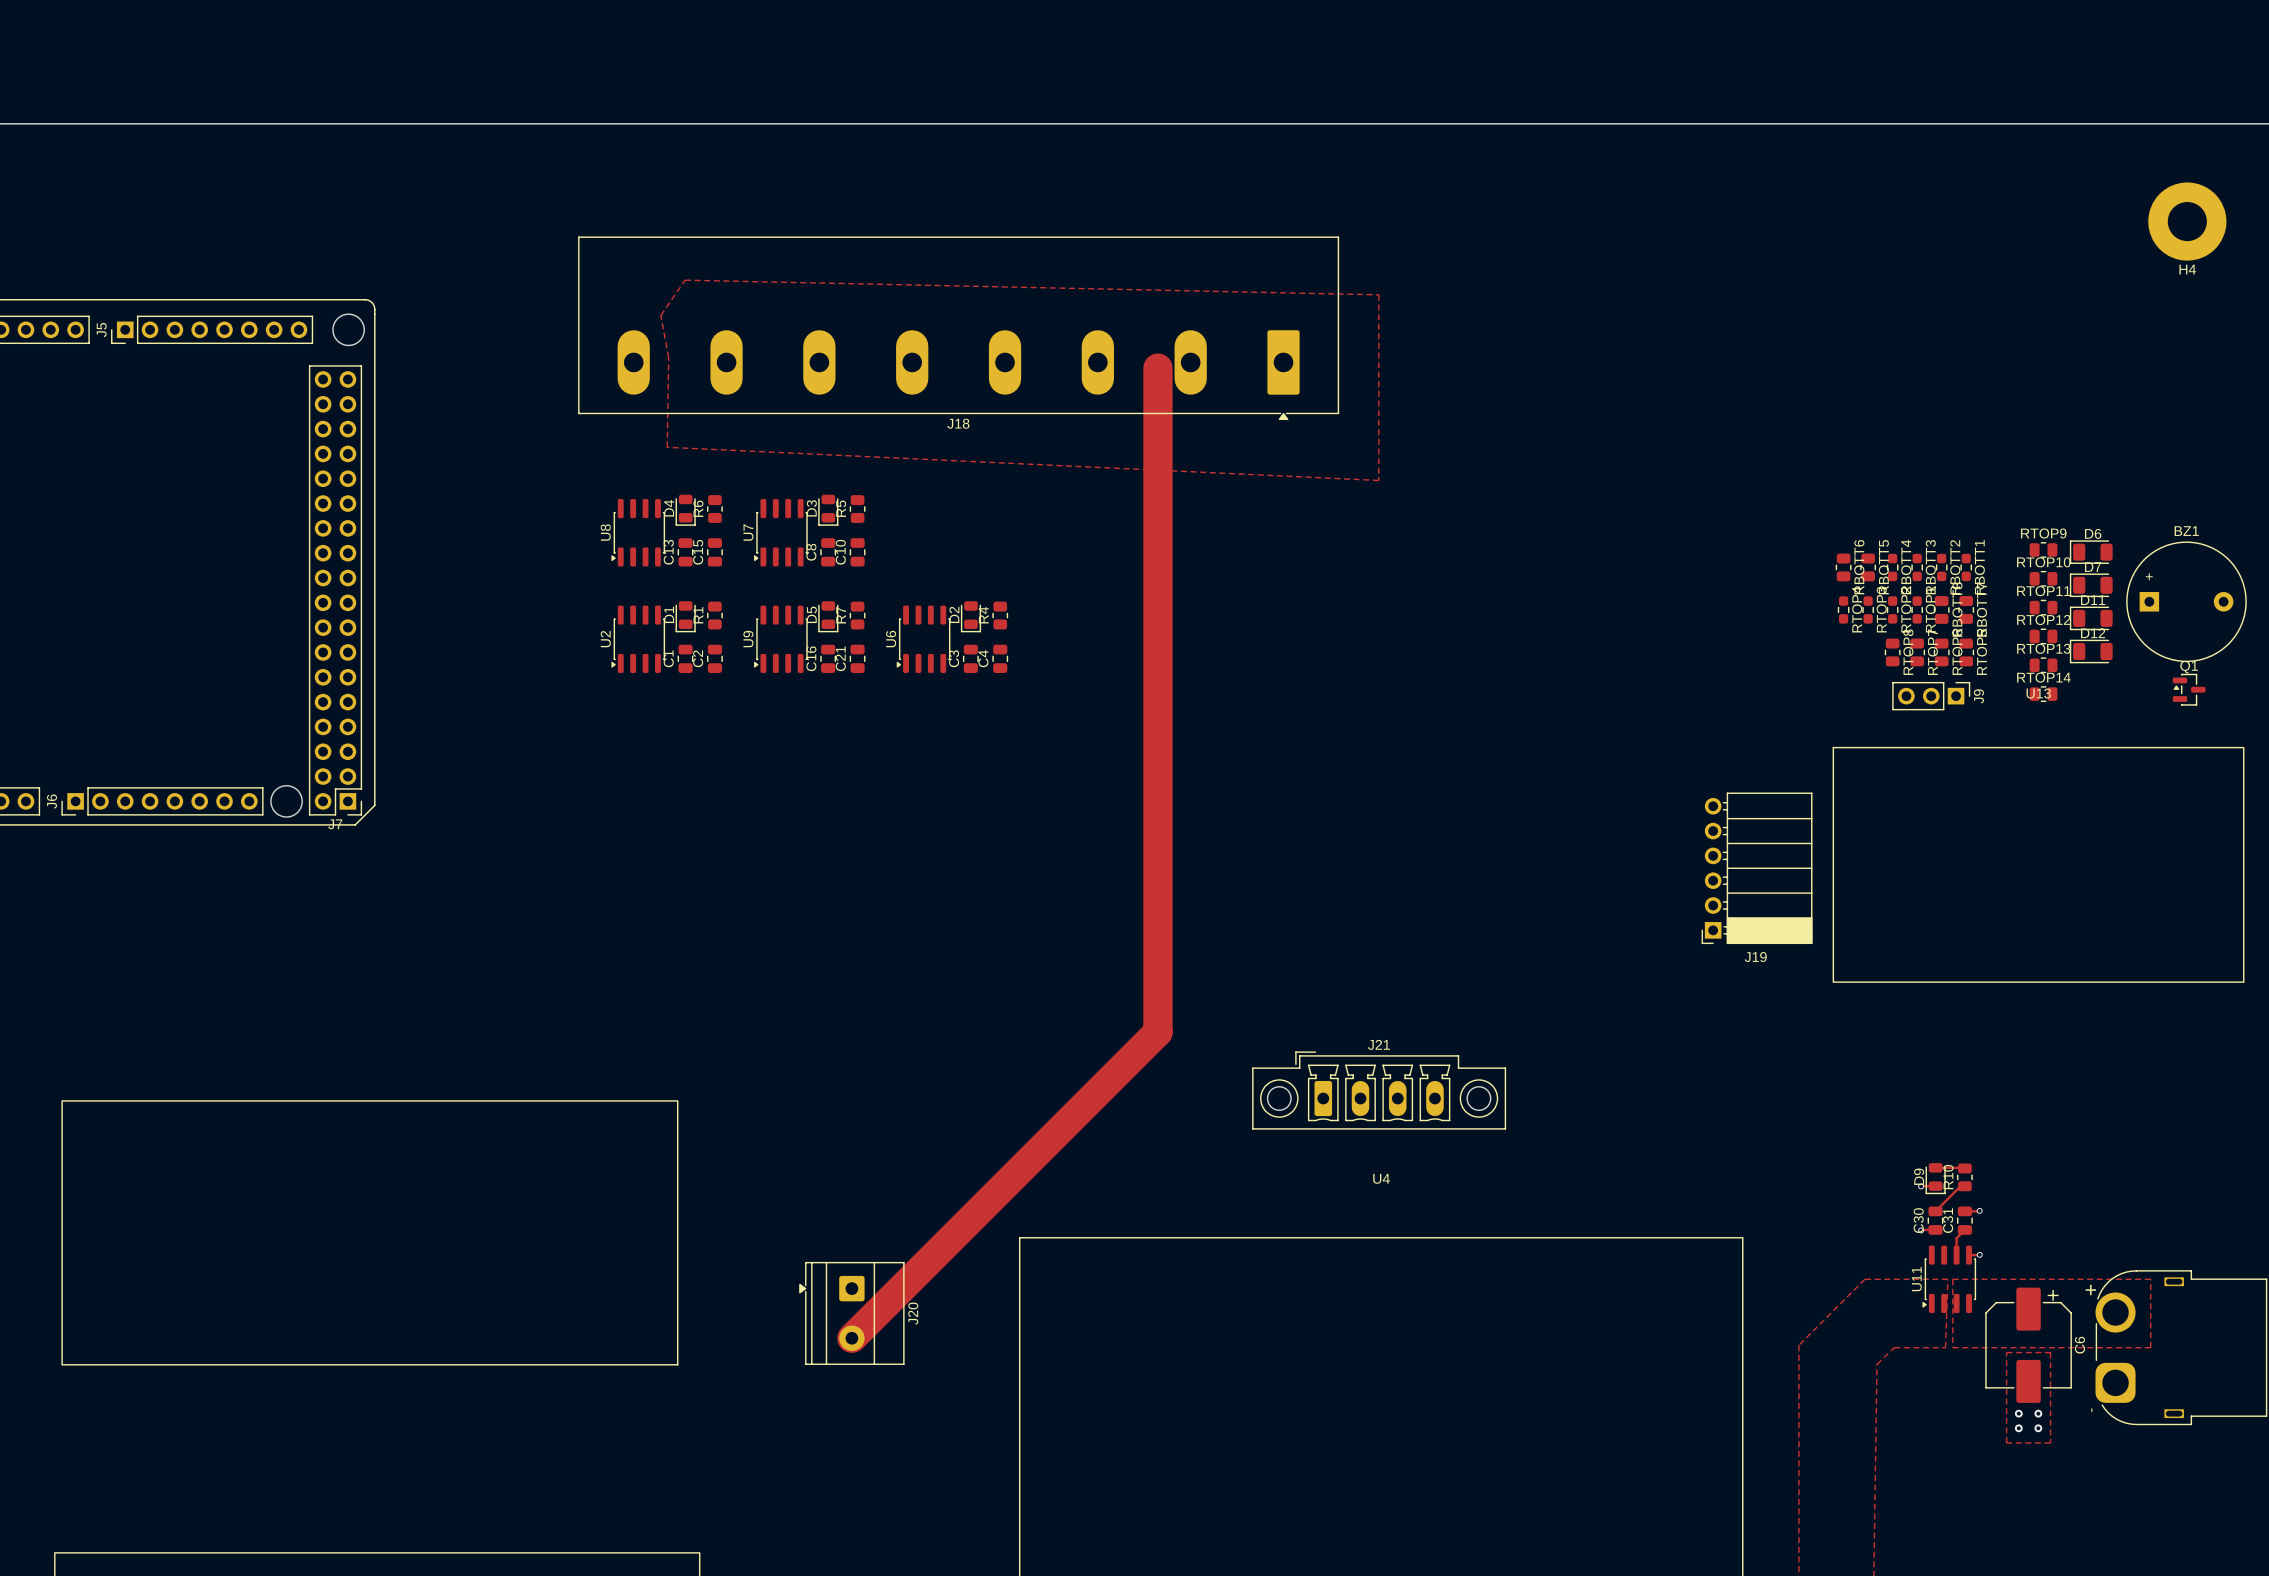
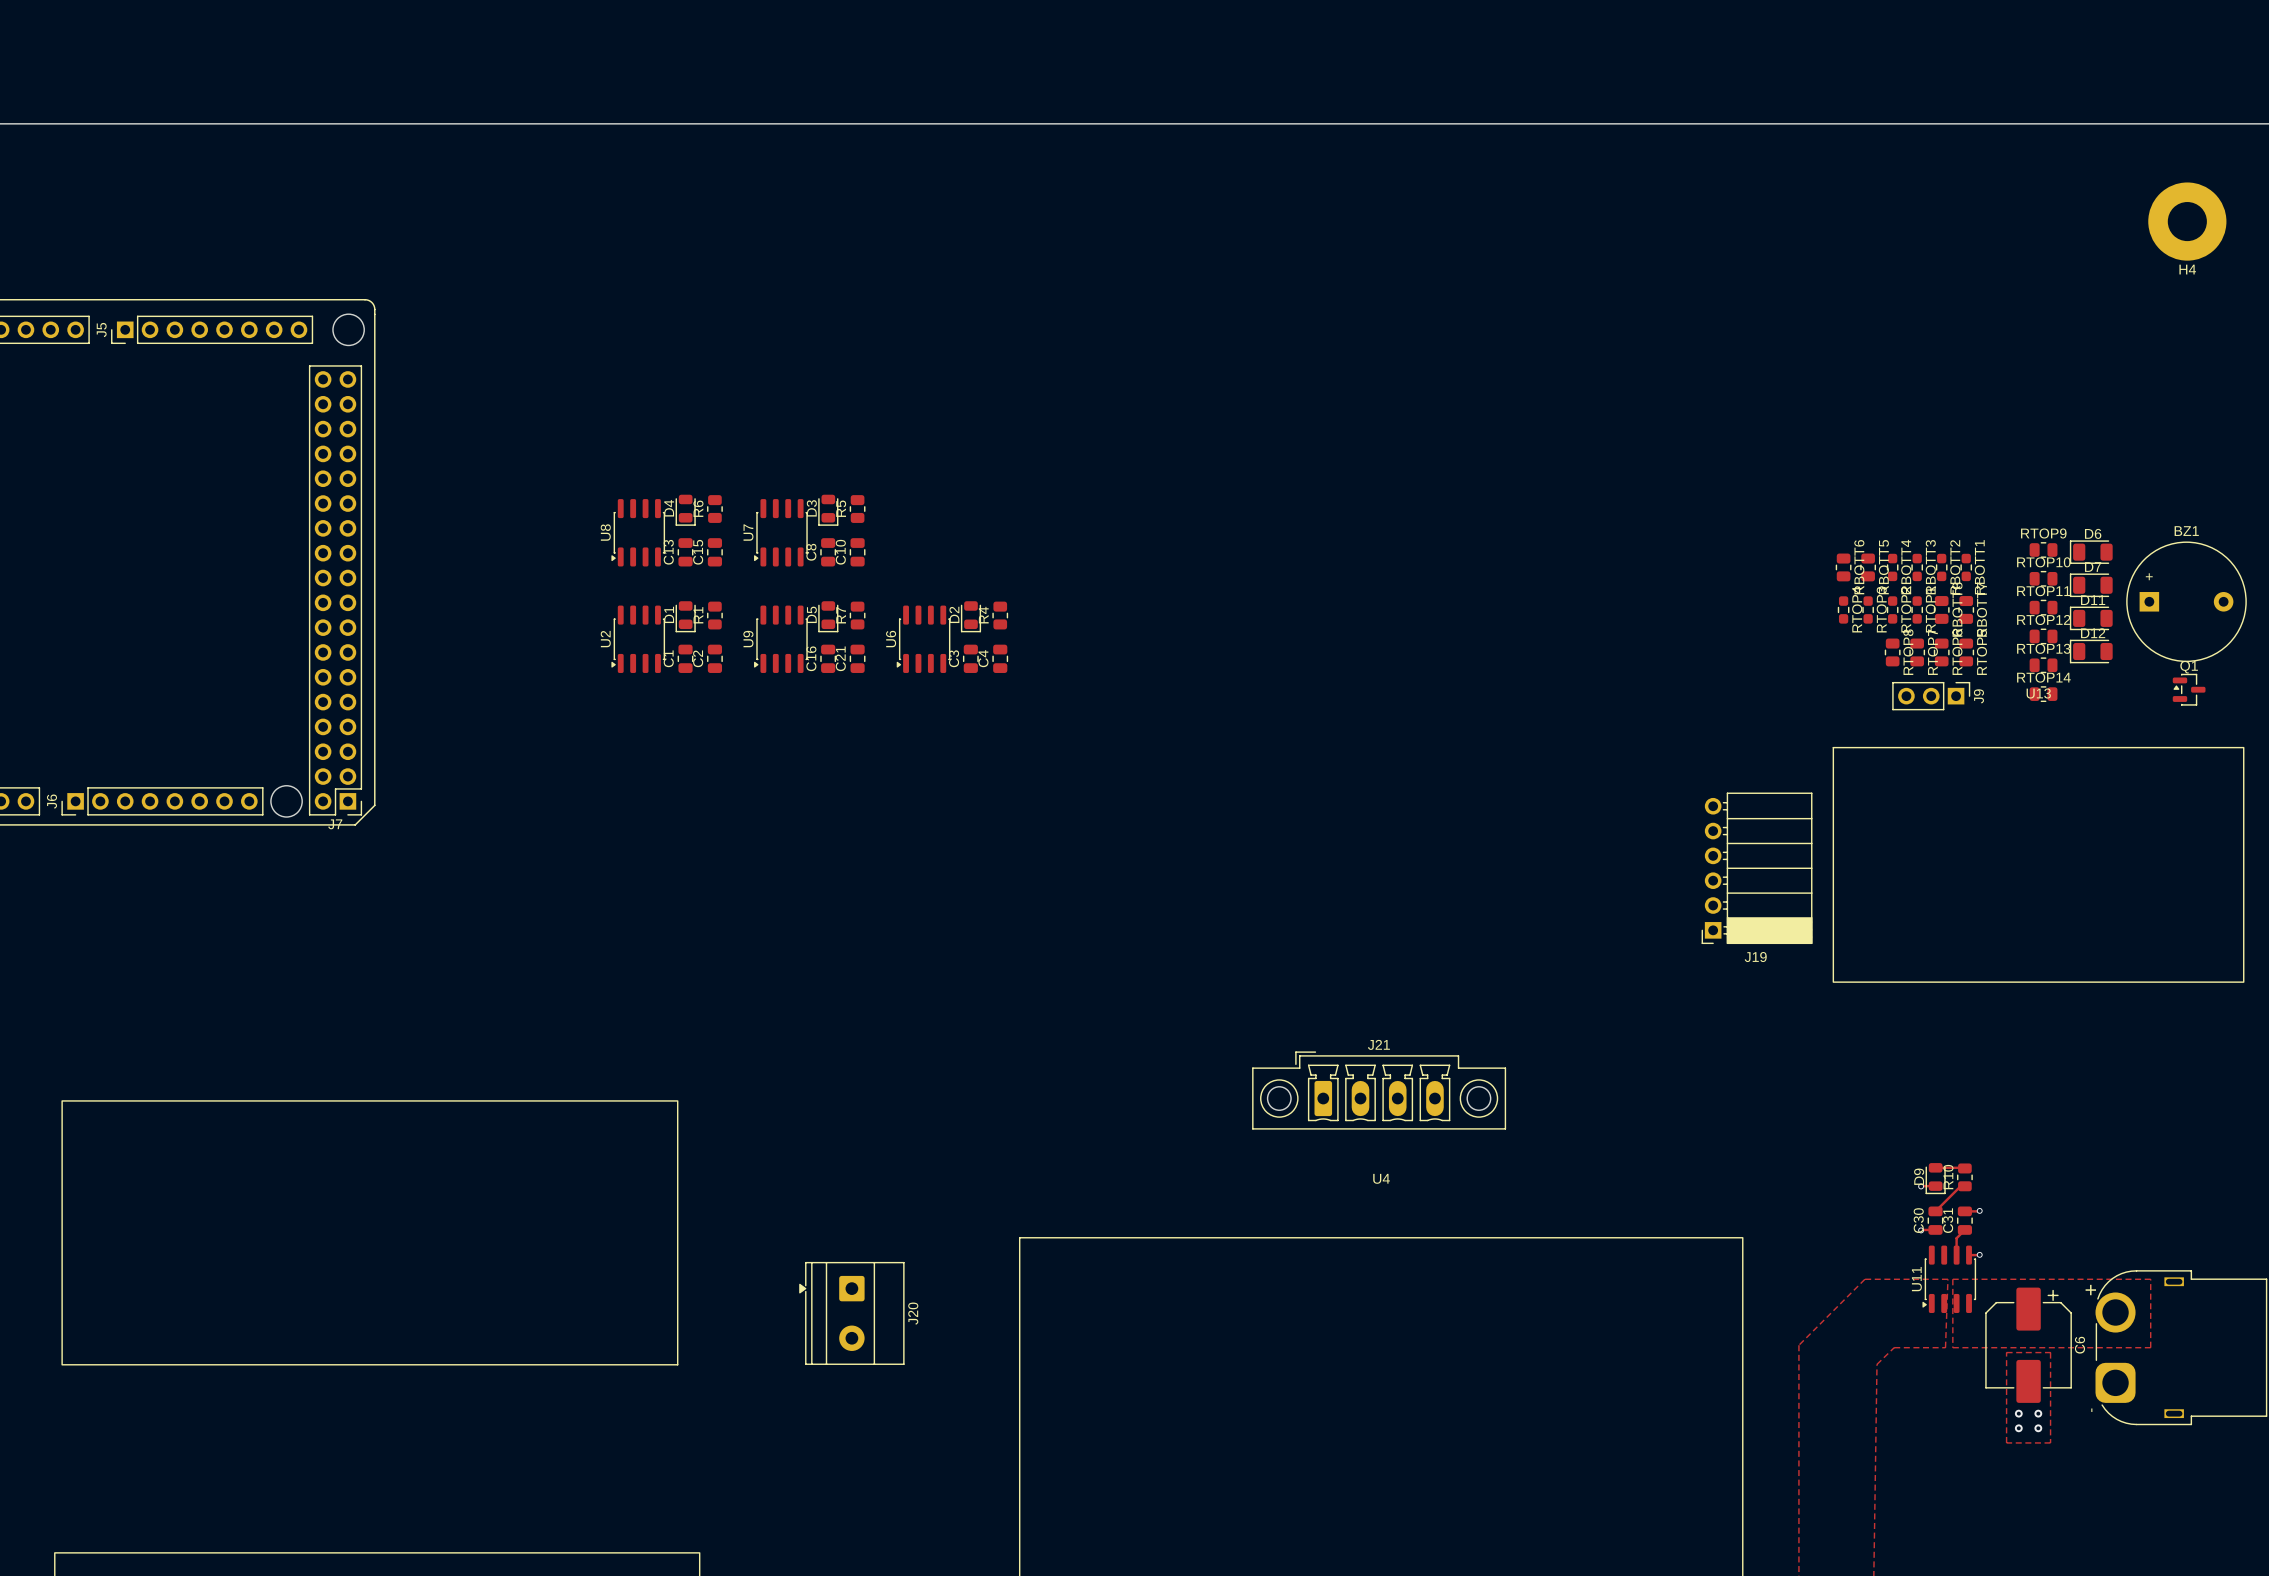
top zone outline: (685, 280) (1378, 294) (1378, 480) (667, 447) (668, 357) (660, 315) (685, 280) -> none
J18: (958, 328) -> none
top track: (1157, 368) (1157, 1032) (851, 1338) -> none

